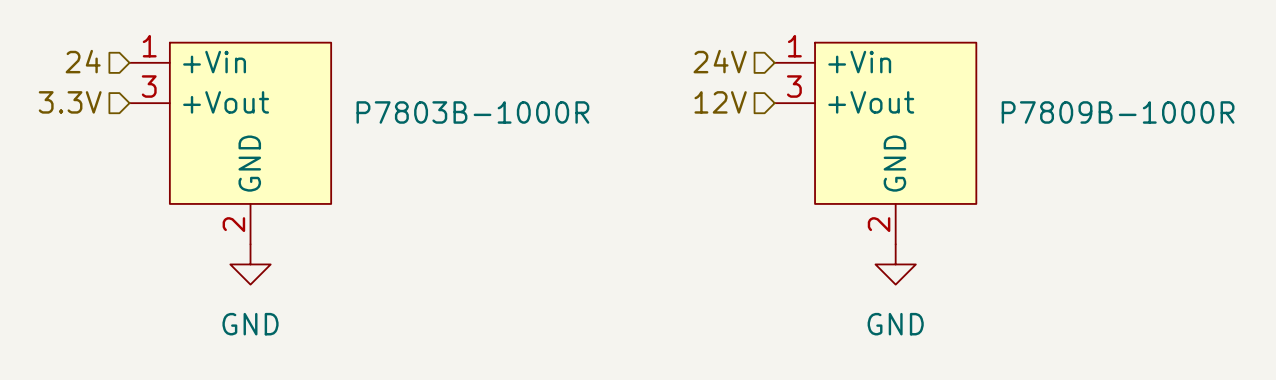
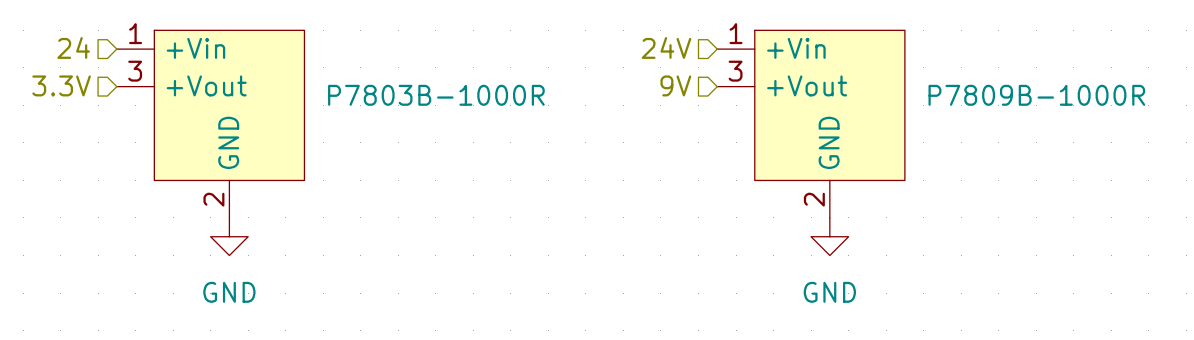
hierarchical label: 12V (720, 102) -> 9V (675, 85)

